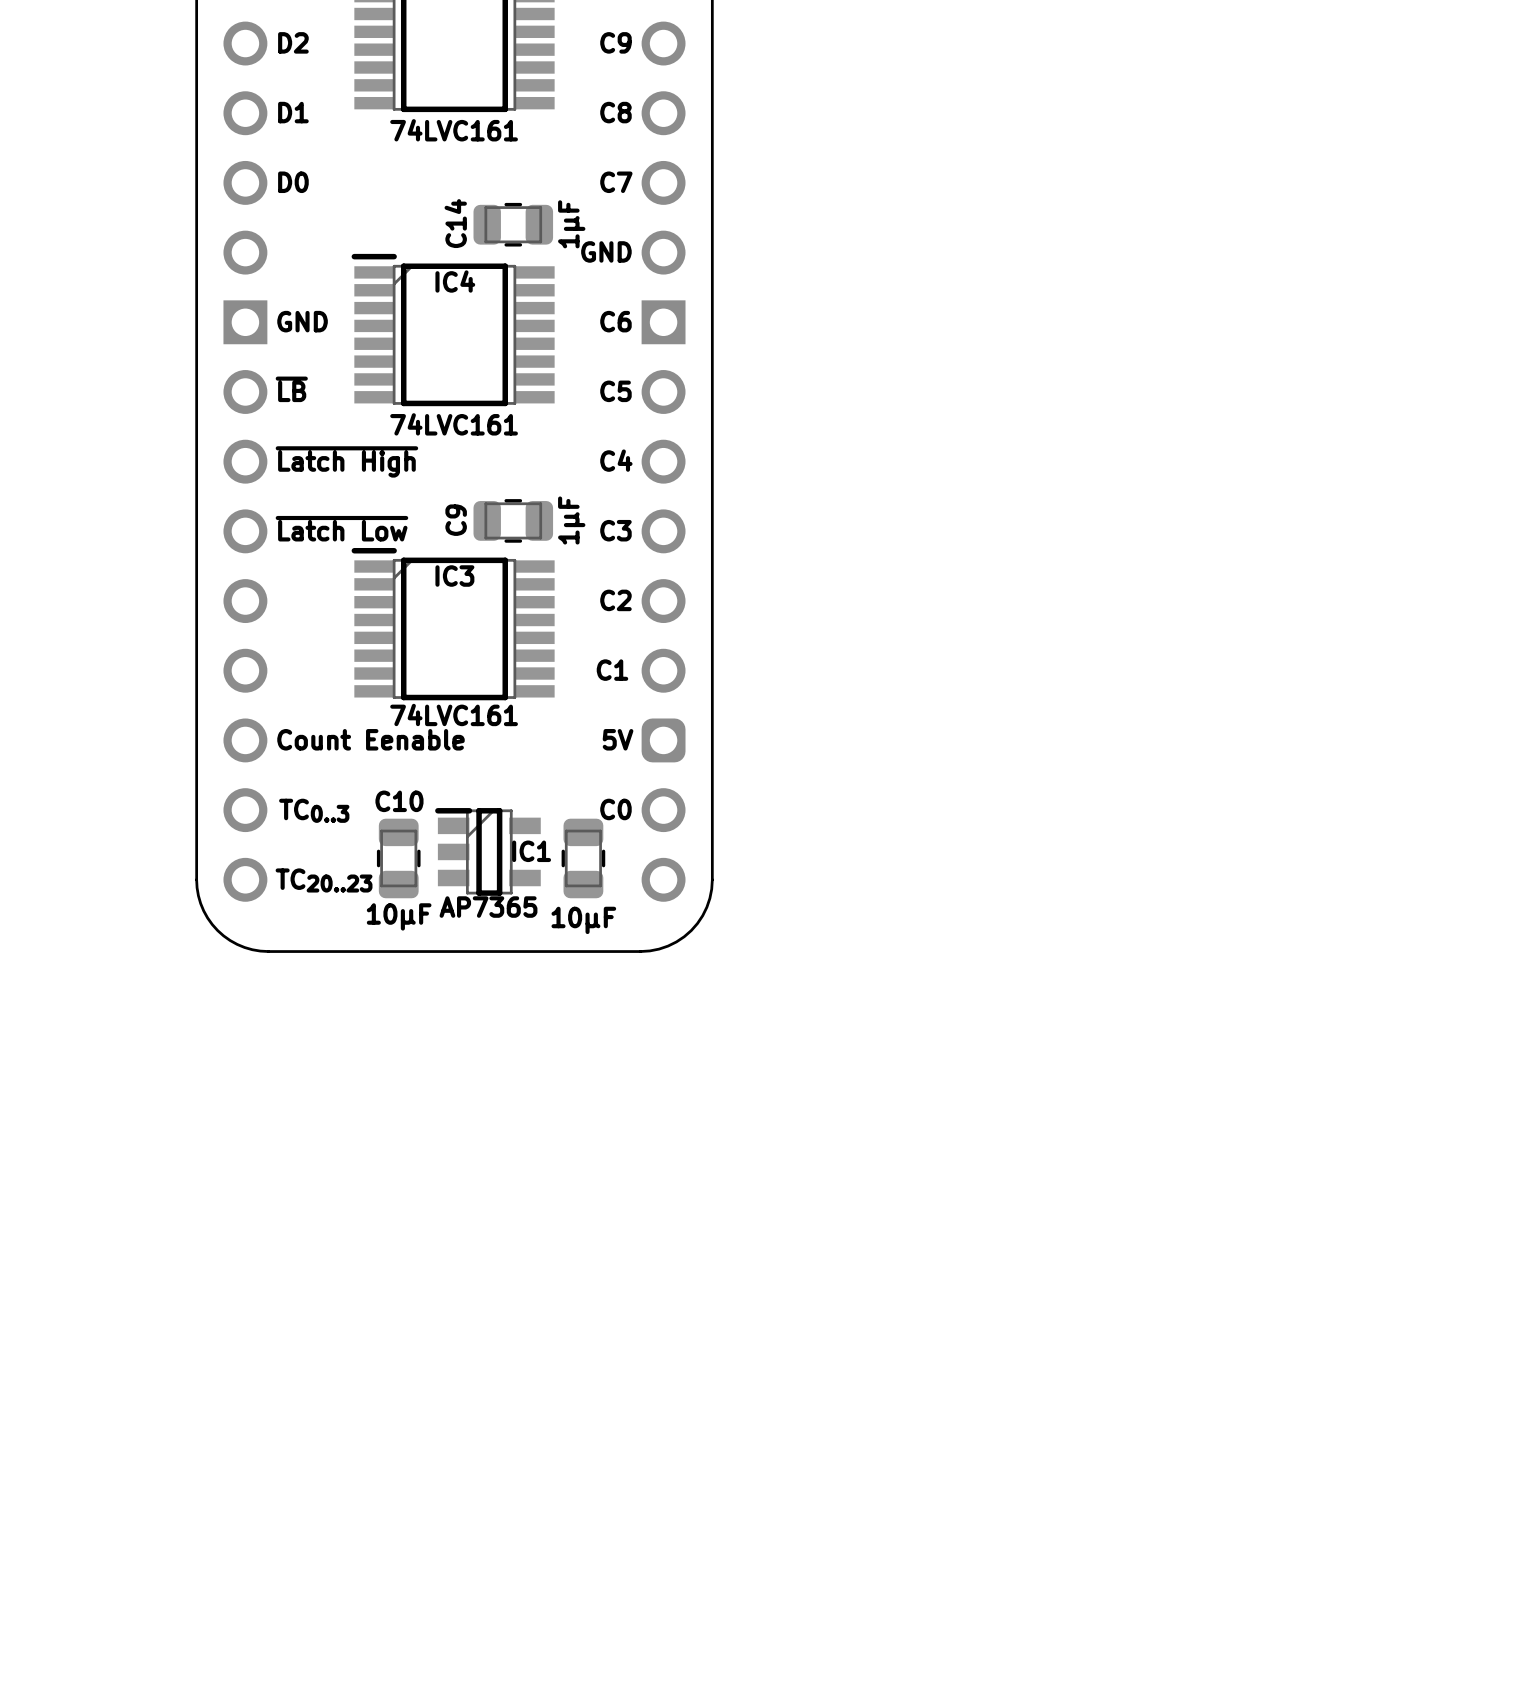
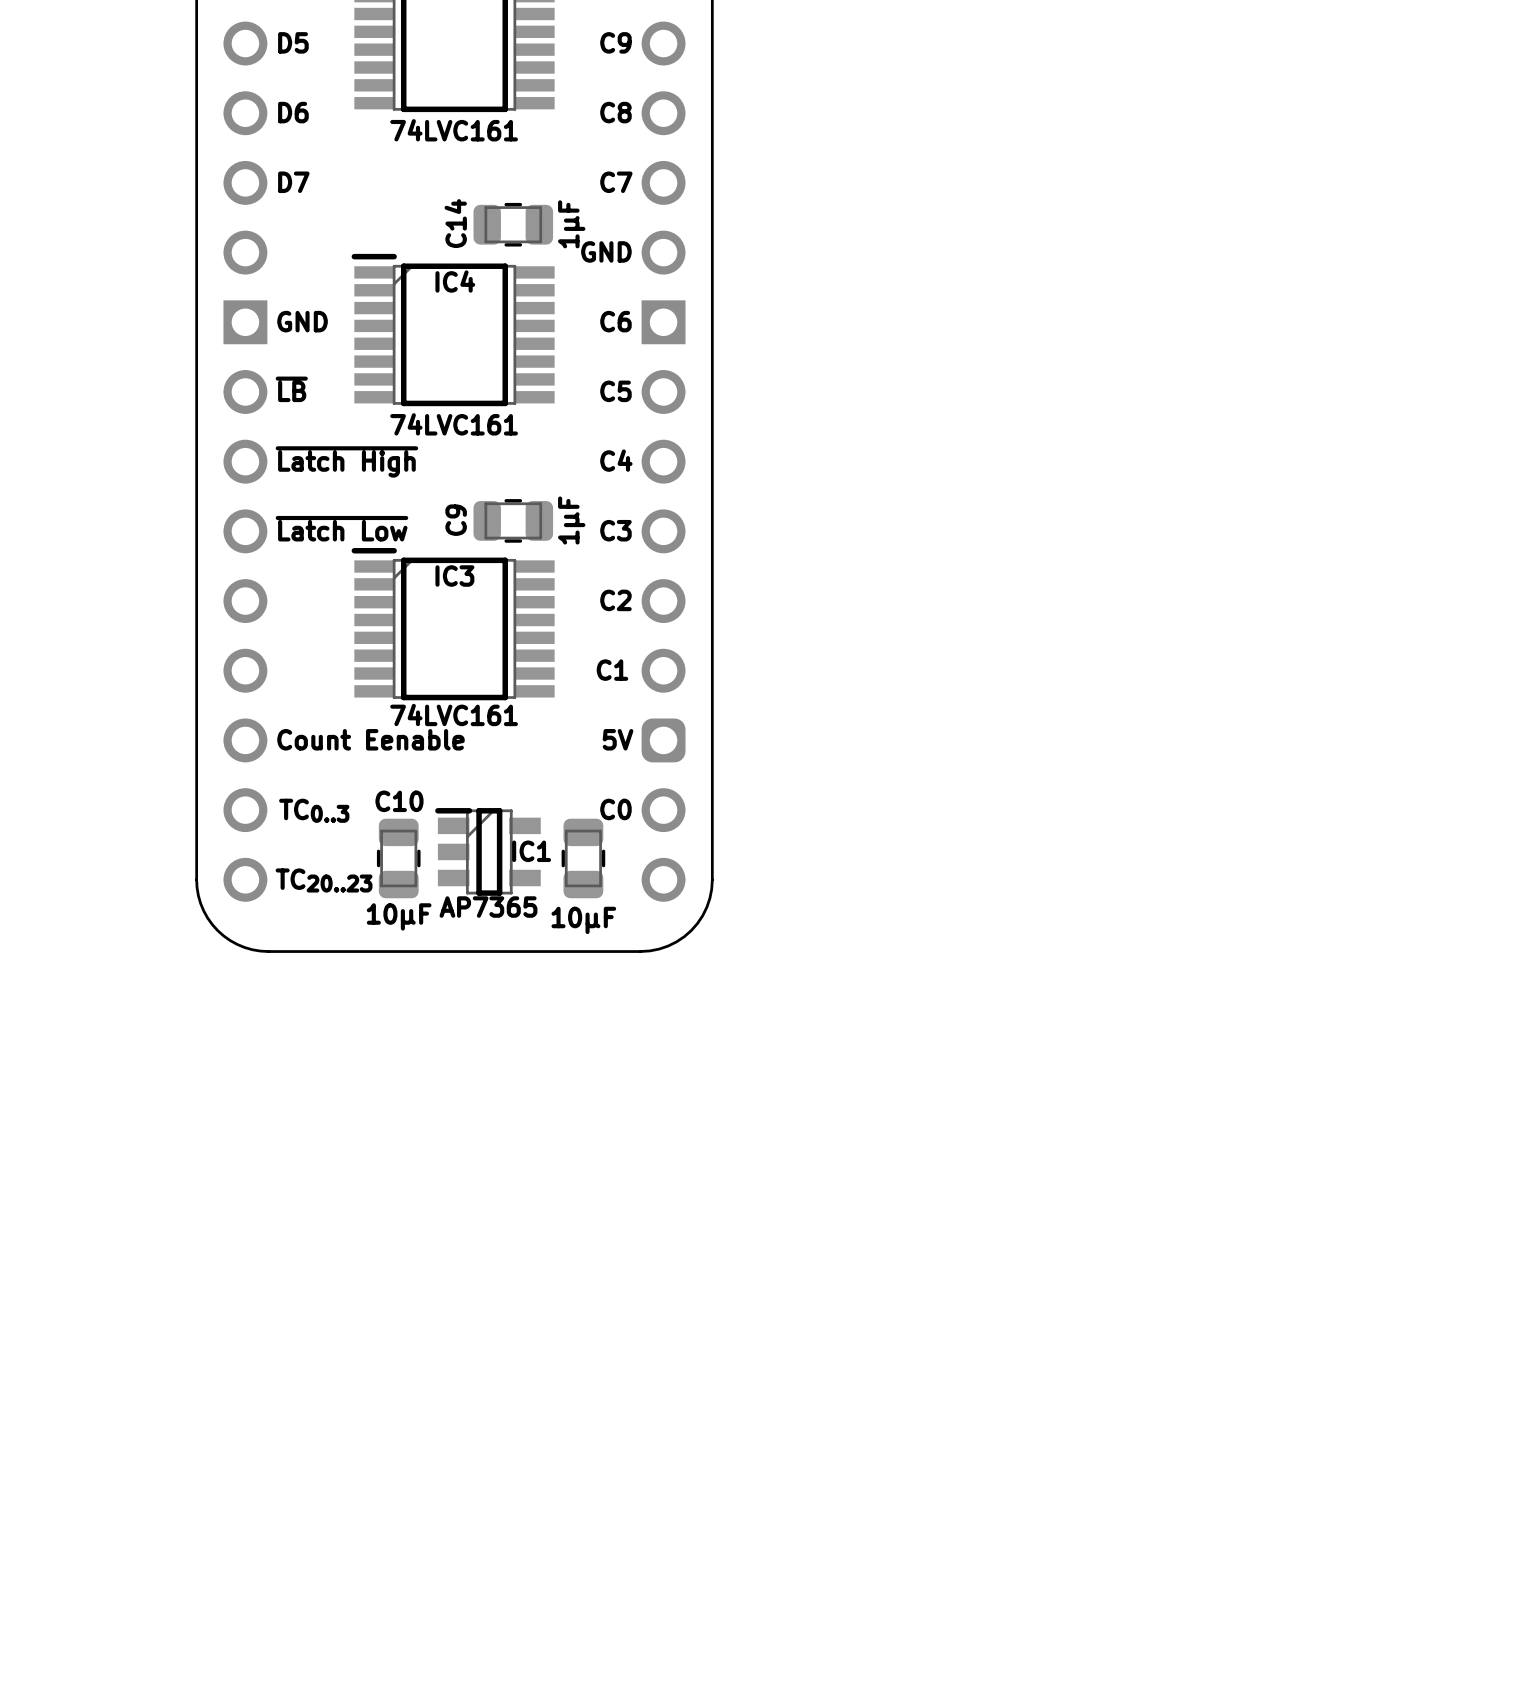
text: D2 (293, 42) -> D5 (293, 42)
text: D1 (293, 112) -> D6 (293, 112)
text: D0 (293, 182) -> D7 (293, 182)

